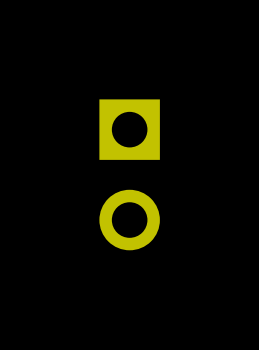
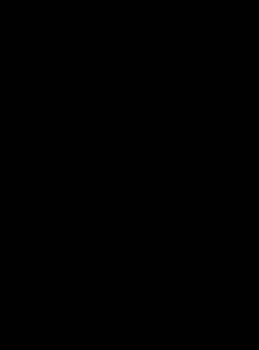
part: (129, 174) -> none

